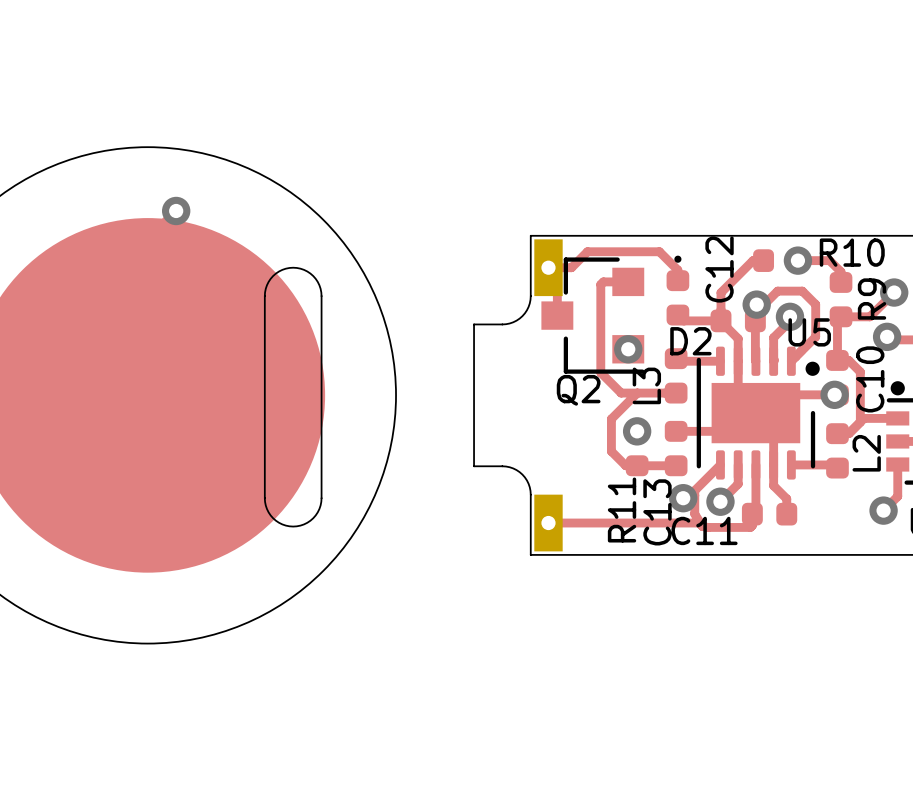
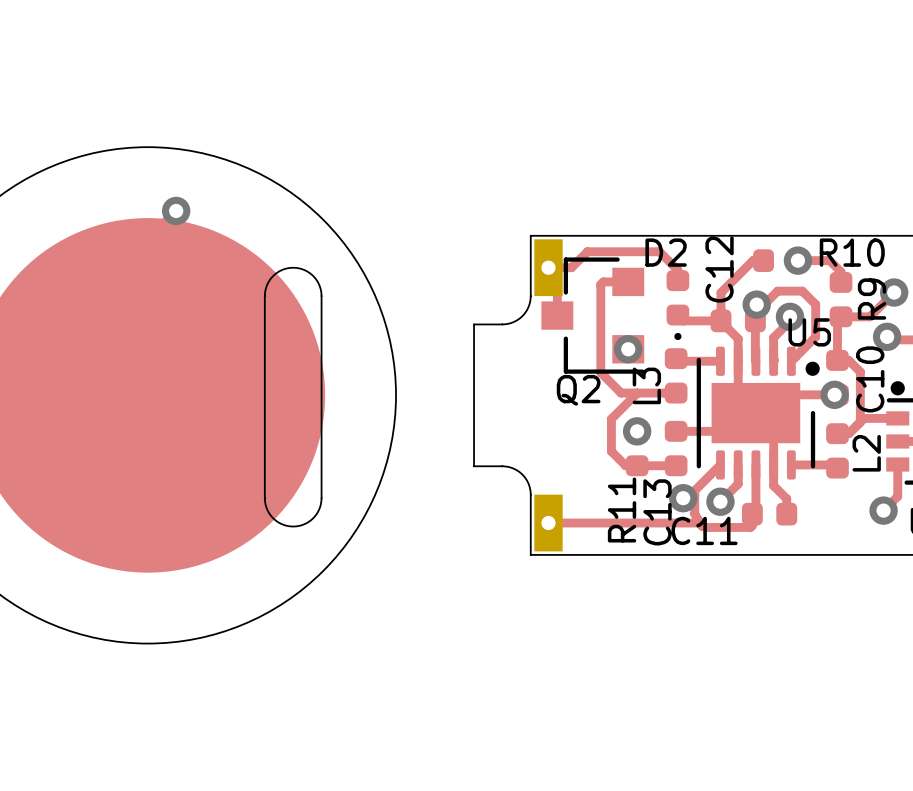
D2 rotation: 0° (677, 290) -> 180° (677, 305)

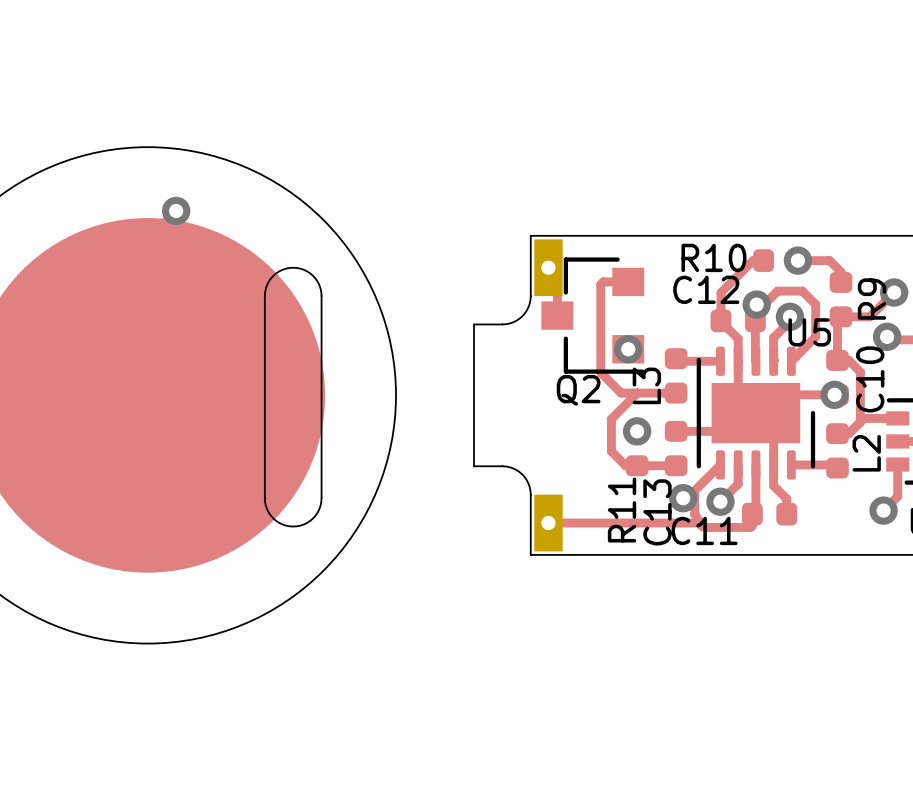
R10 name position: R10 (852, 252) -> R10 (713, 257)
track: (548, 267) (571, 267) (587, 251) (659, 251) (677, 270) (677, 280) -> none
C12 name rotation: 0° (719, 269) -> 90° clockwise (706, 289)
D2: (677, 305) -> none
track: (677, 315) (683, 320) (720, 320) -> none
drawing: [805, 361, 820, 376] -> none
drawing: [890, 381, 905, 396] -> none

